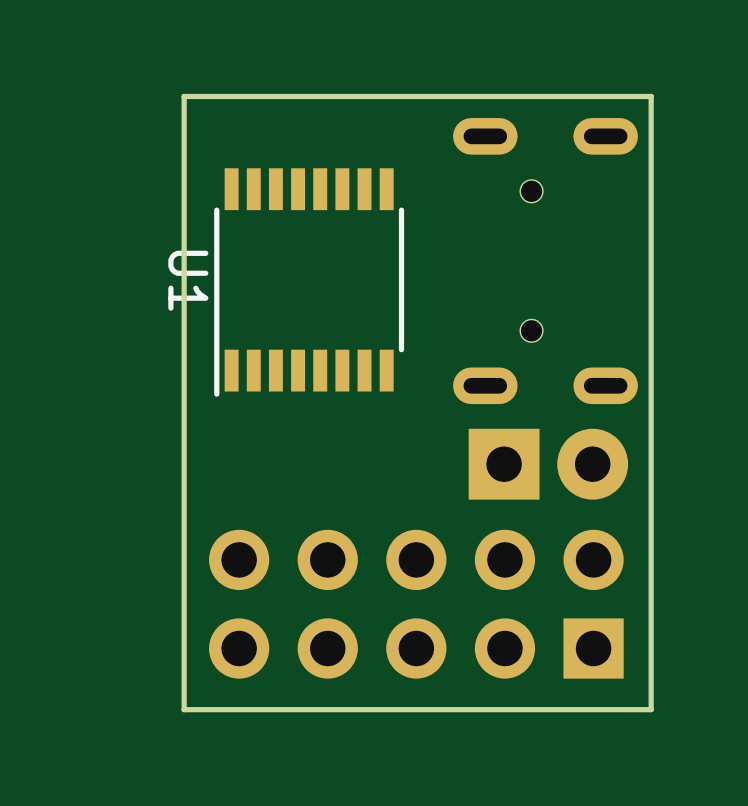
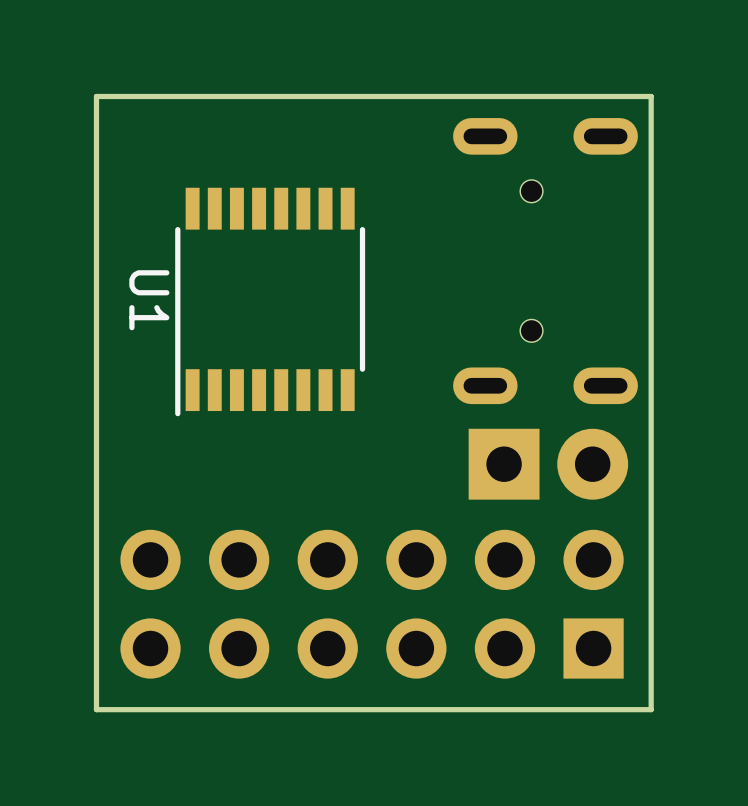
board edge: (184, 96) (184, 709) -> (184, 96) (96, 96) (96, 709) (184, 709)
U1 position: (309, 282) -> (270, 302)
part: none -> (372, 604)

